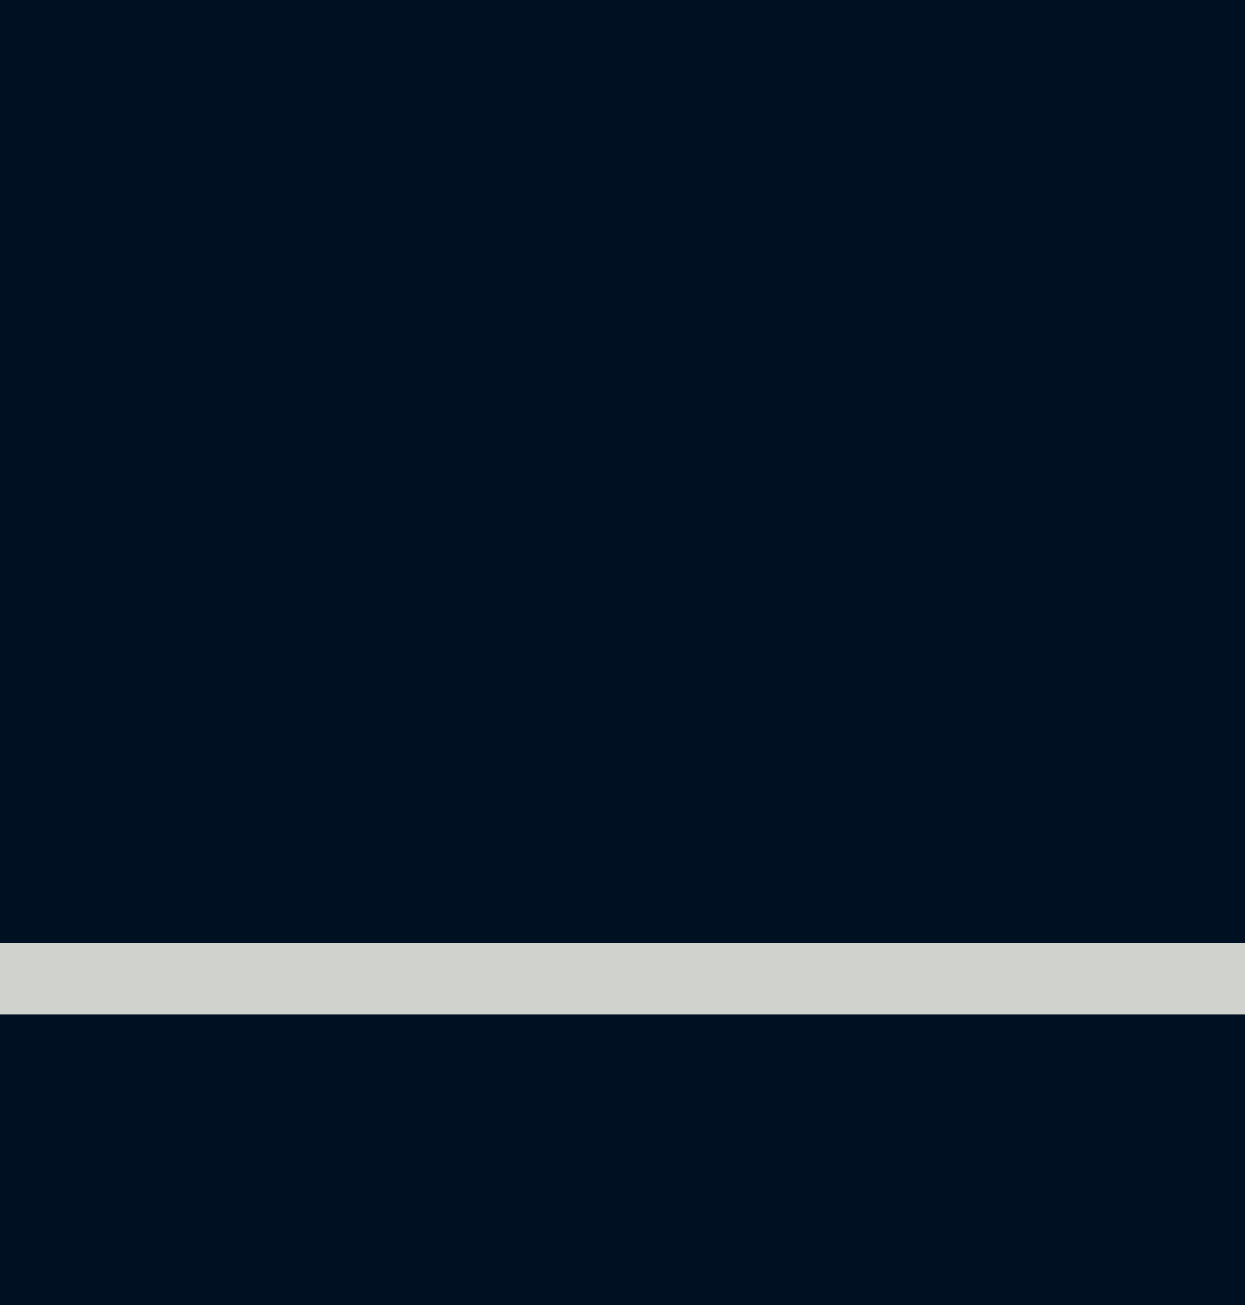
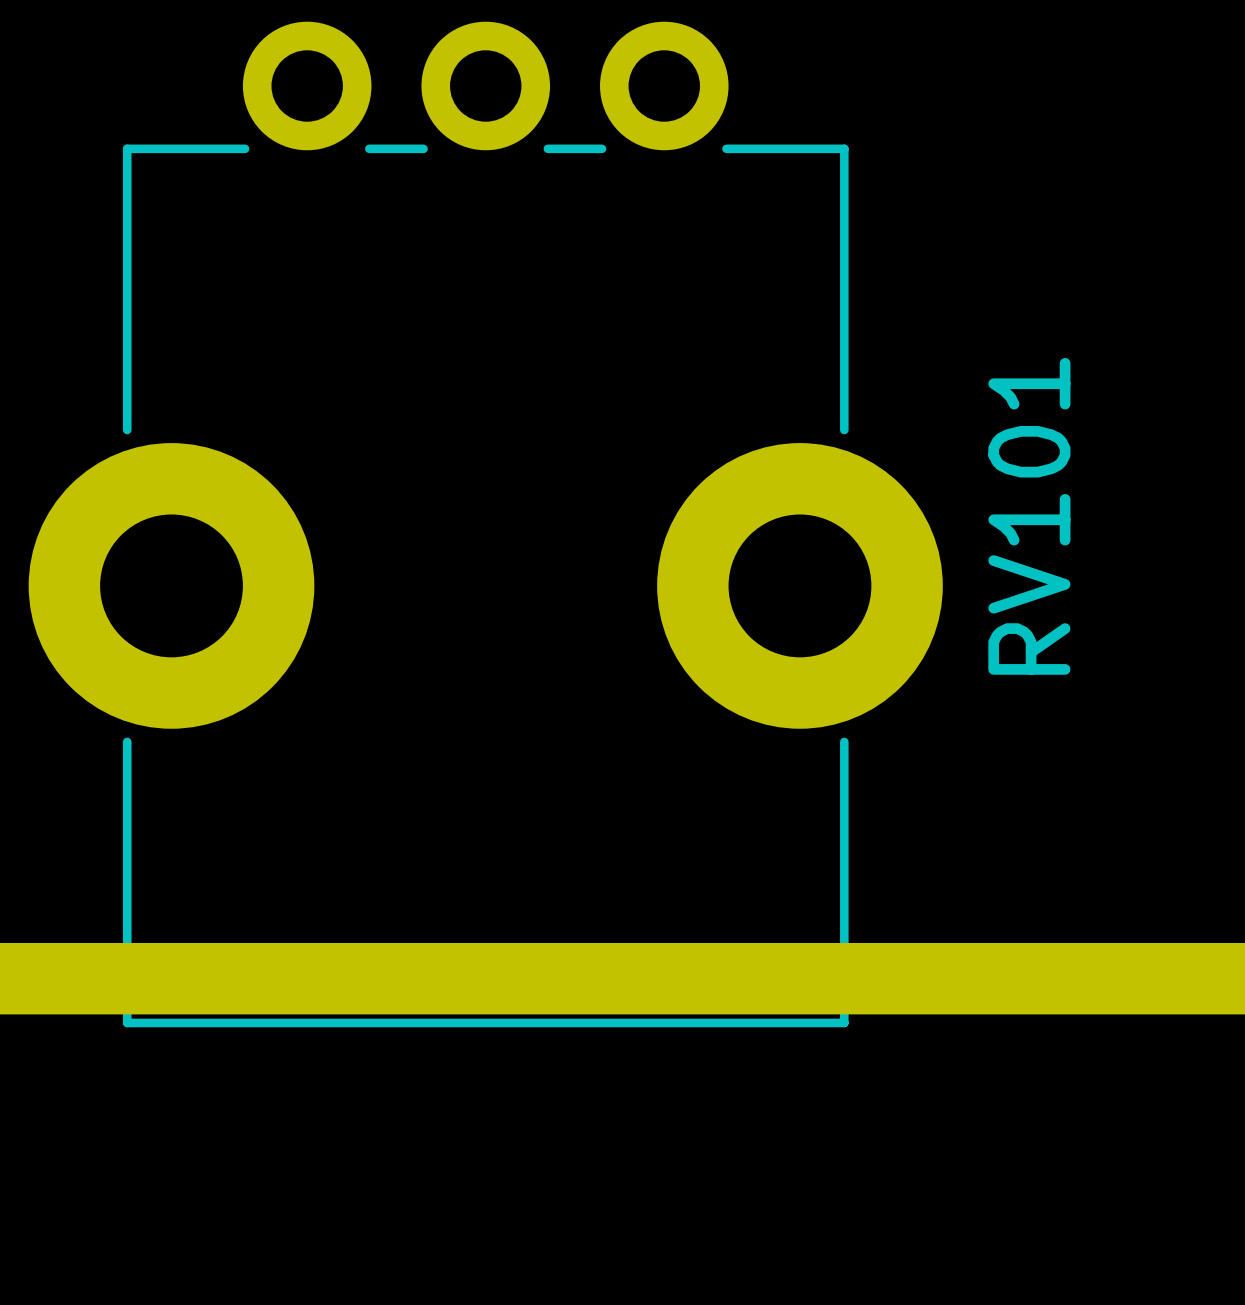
RV101: none -> (485, 524)

